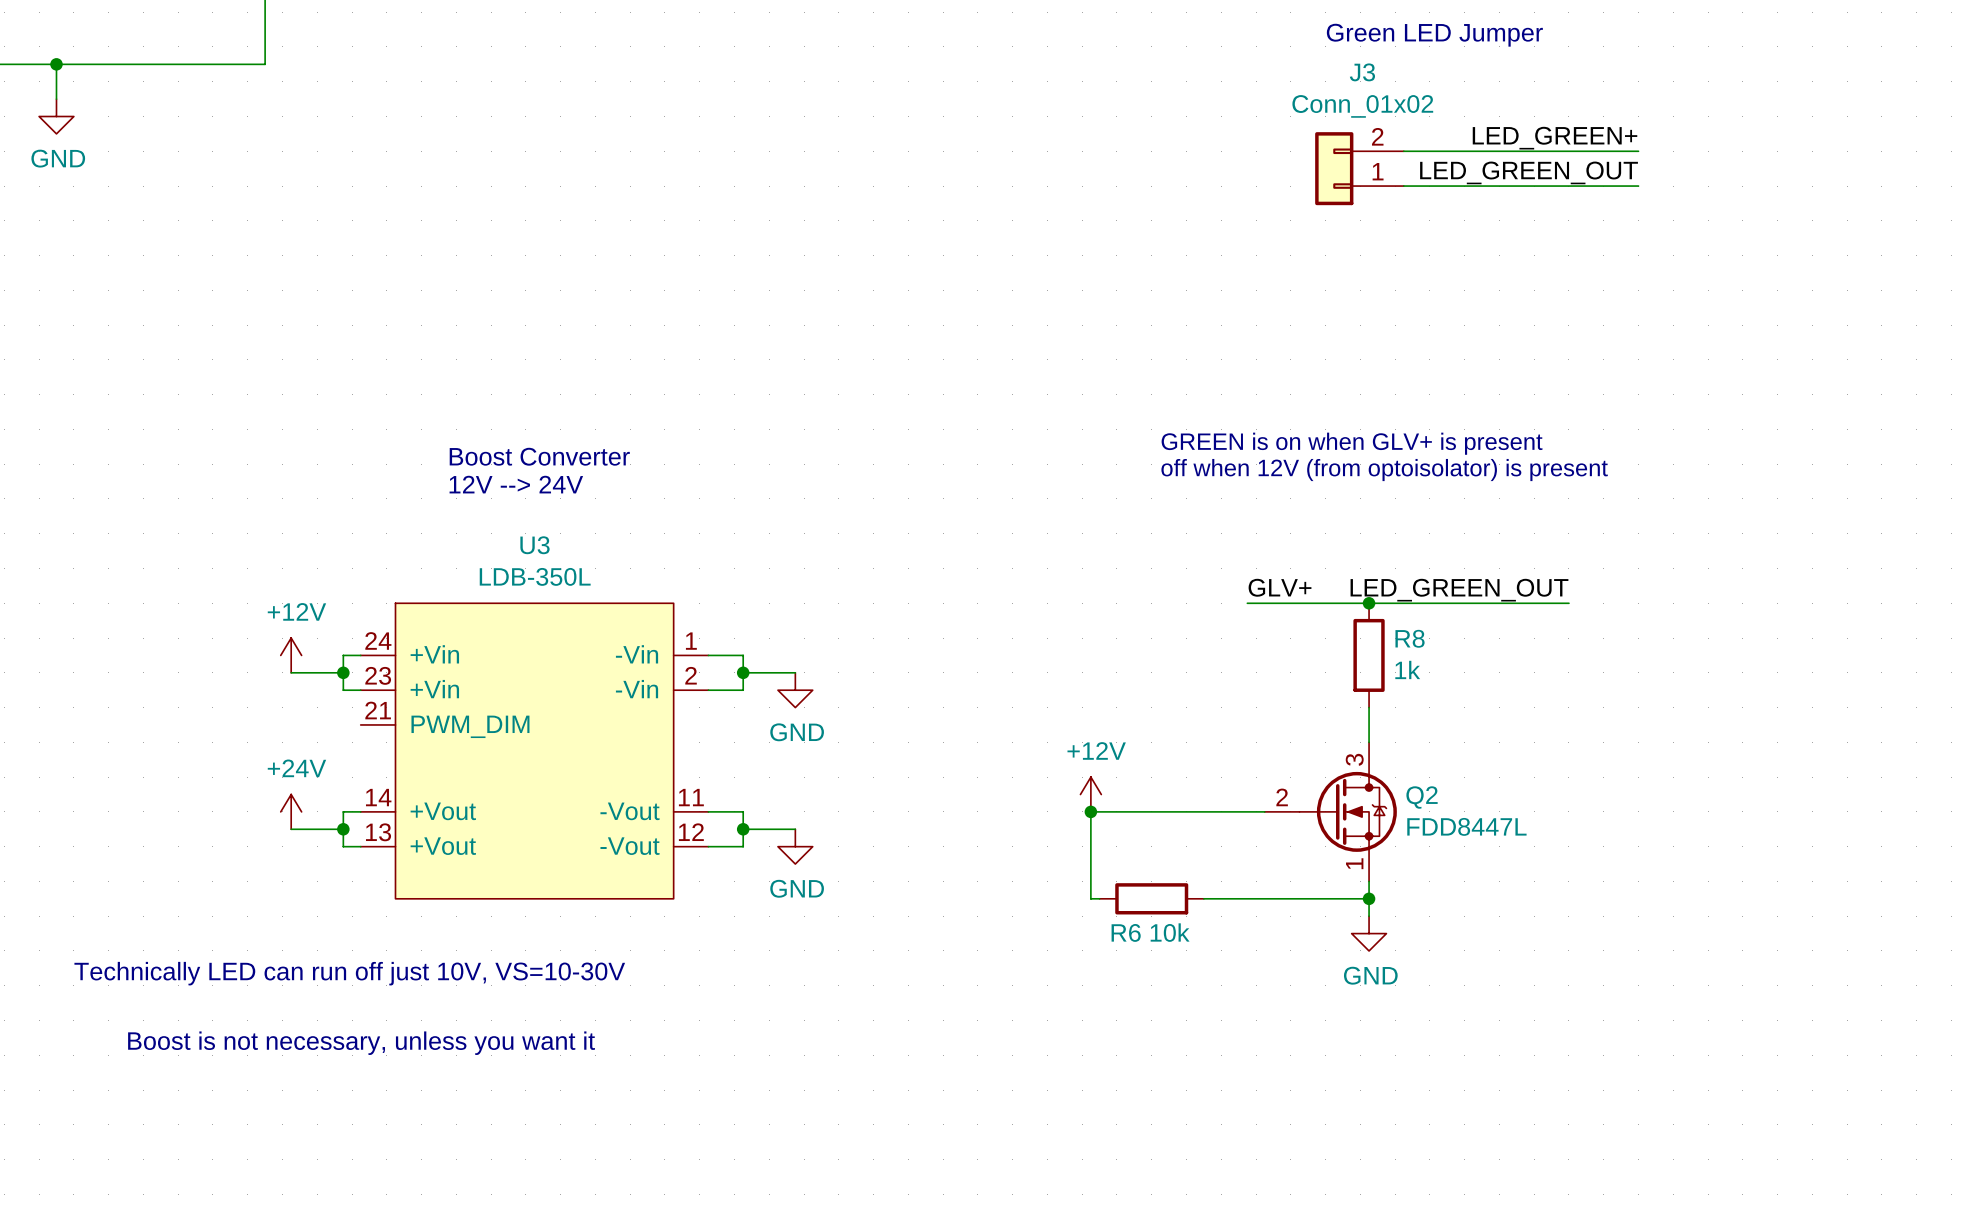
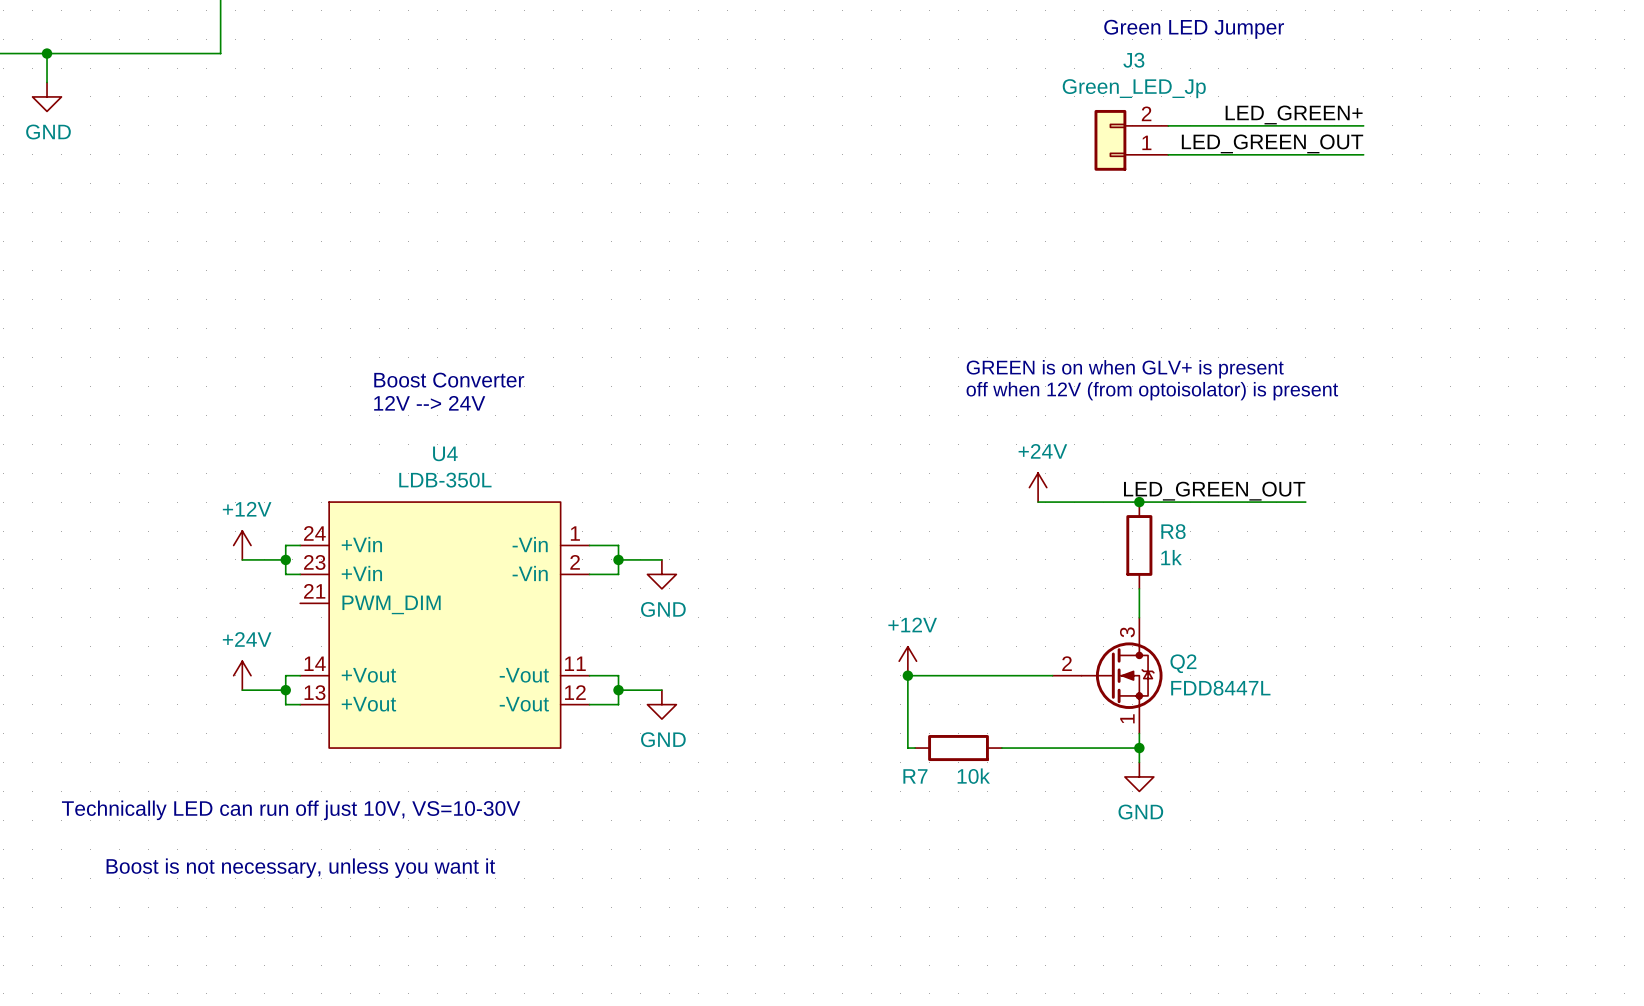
J3 value: Conn_01x02 (1362, 106) -> Green_LED_Jp (1134, 88)
U3 name: U3 (534, 545) -> U4 (445, 453)
power symbol: none -> +24V (1038, 487)
label: GLV+ (1280, 587) -> none
R6 name: R6 (1126, 932) -> R7 (915, 776)

